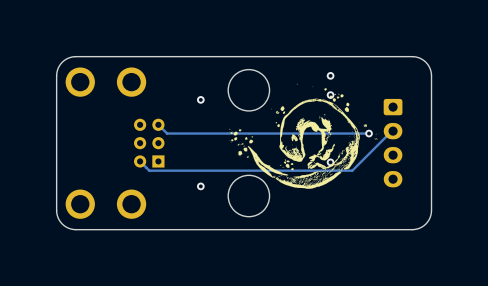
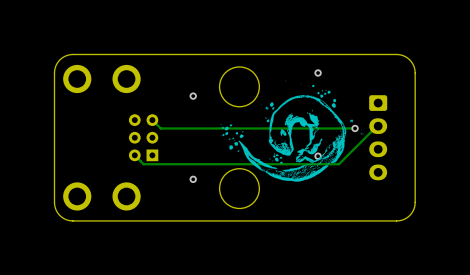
via: (330, 95) -> none

